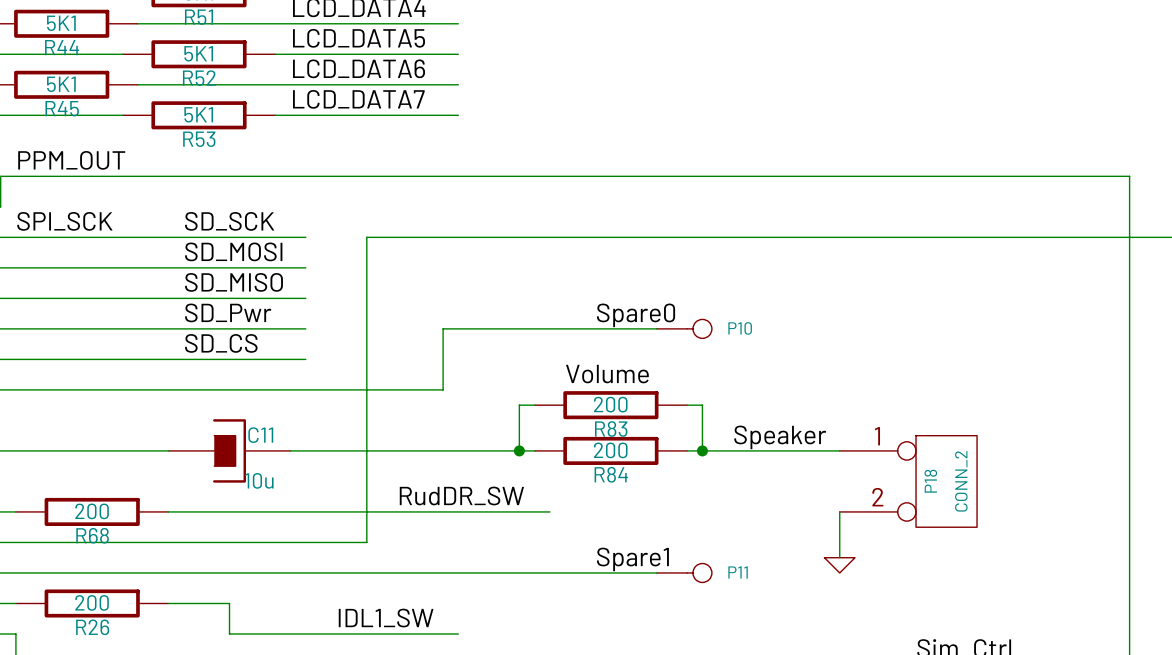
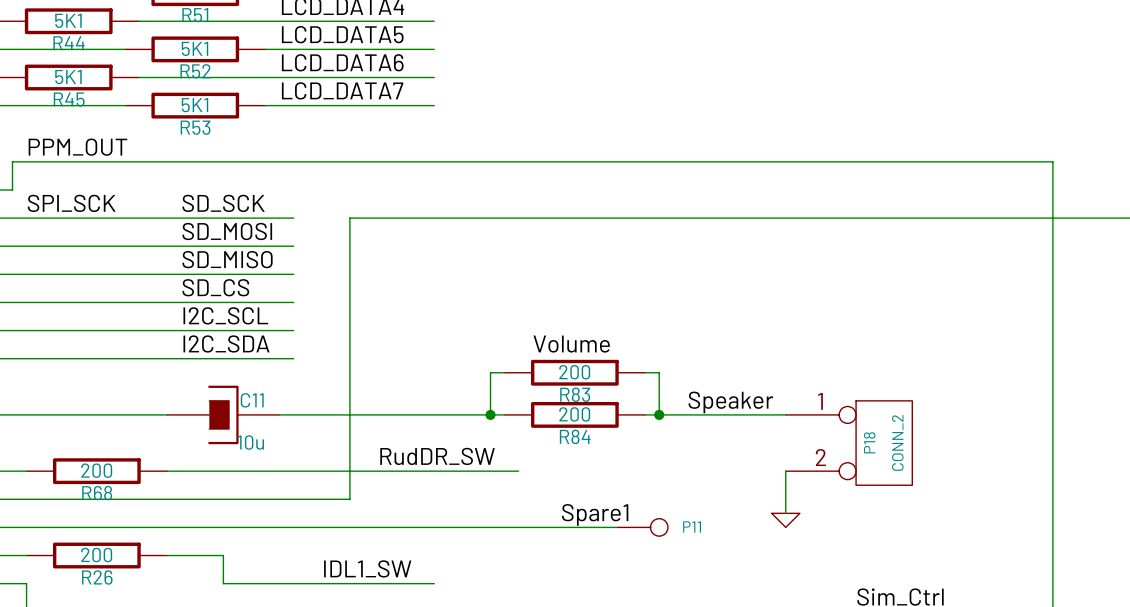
label: SD_Pwr (228, 312) -> SD_CS (215, 287)
label: Spare0 (636, 315) -> none
wire: (656, 328) (443, 328) (443, 389) (305, 389) -> none
P10: (684, 328) -> none
label: SD_CS (221, 343) -> I2C_SCL (225, 315)
label: none -> I2C_SDA (226, 343)

